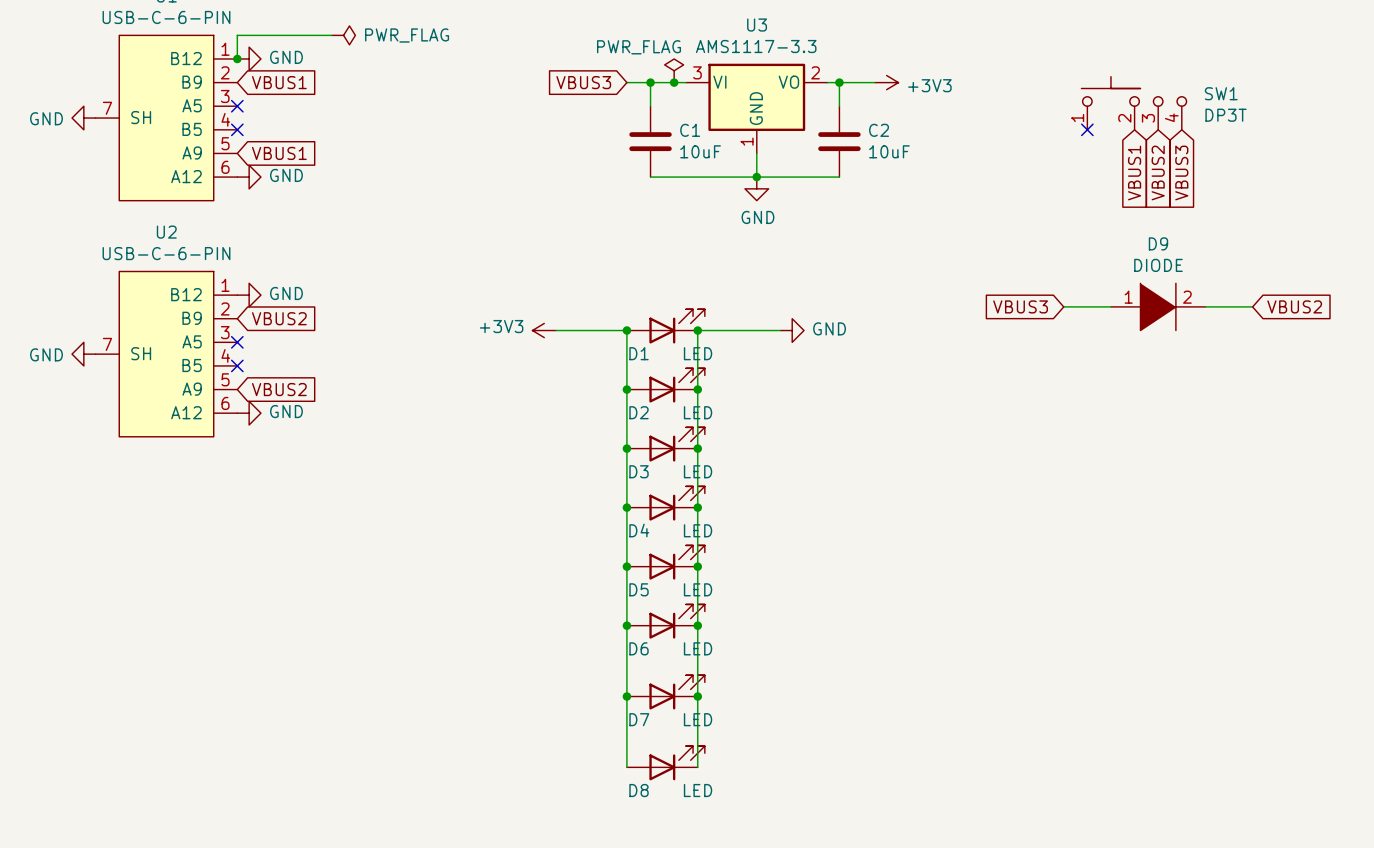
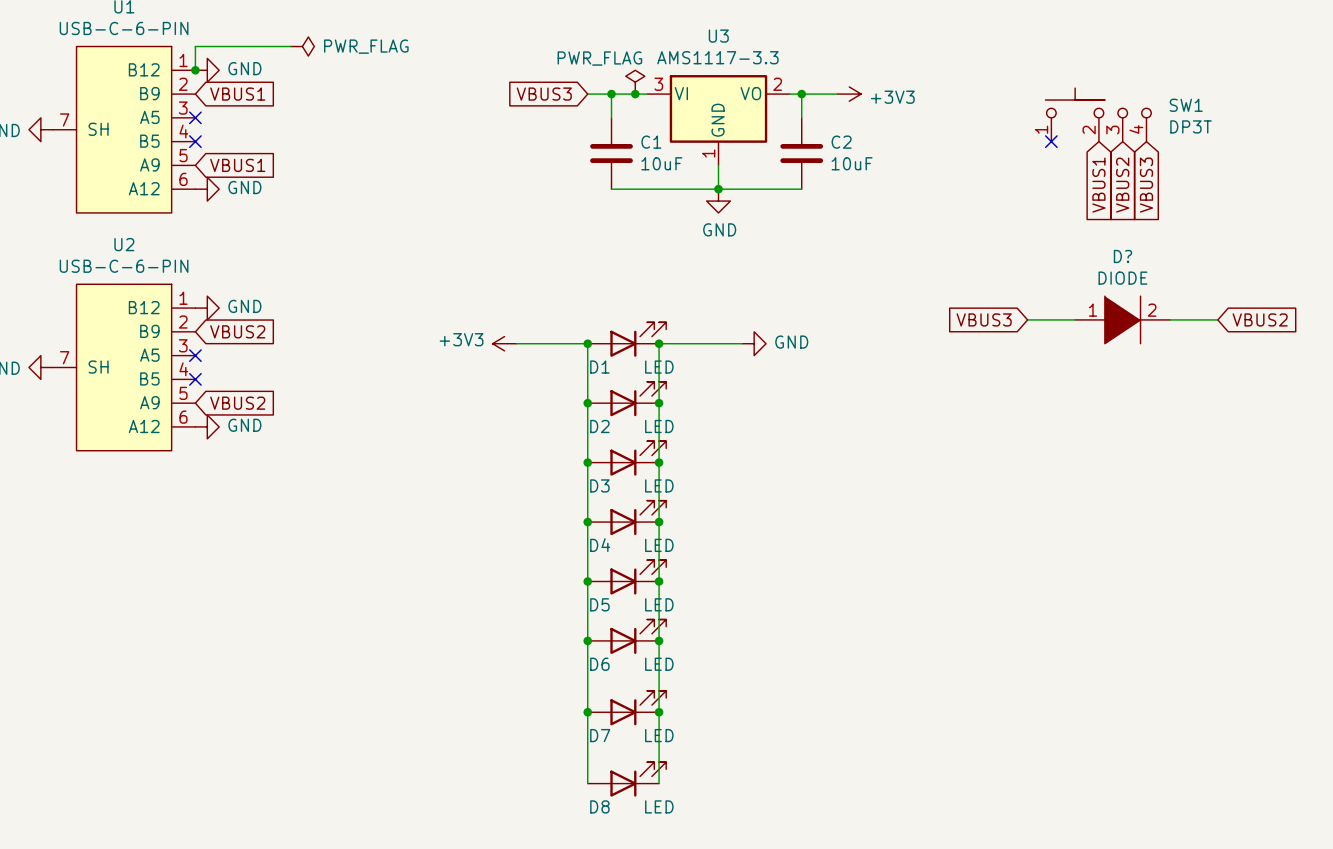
D9 name: D9 (1158, 243) -> D? (1122, 256)

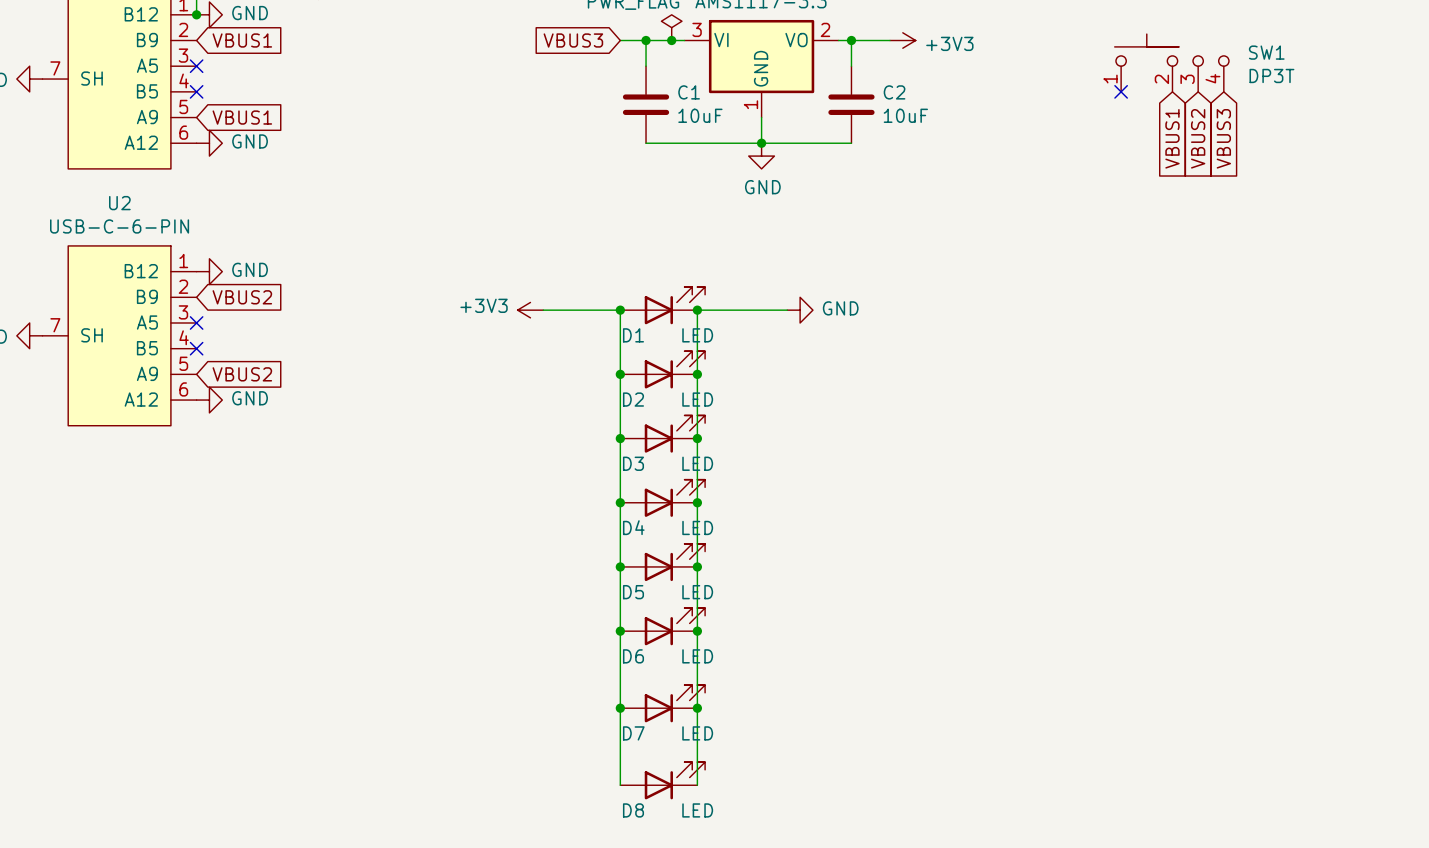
global label: VBUS3 (984, 319) -> none
wire: (1027, 319) (1075, 319) -> none
D?: DIODE (1122, 319) -> none
wire: (1170, 319) (1217, 319) -> none
global label: VBUS2 (1260, 319) -> none

